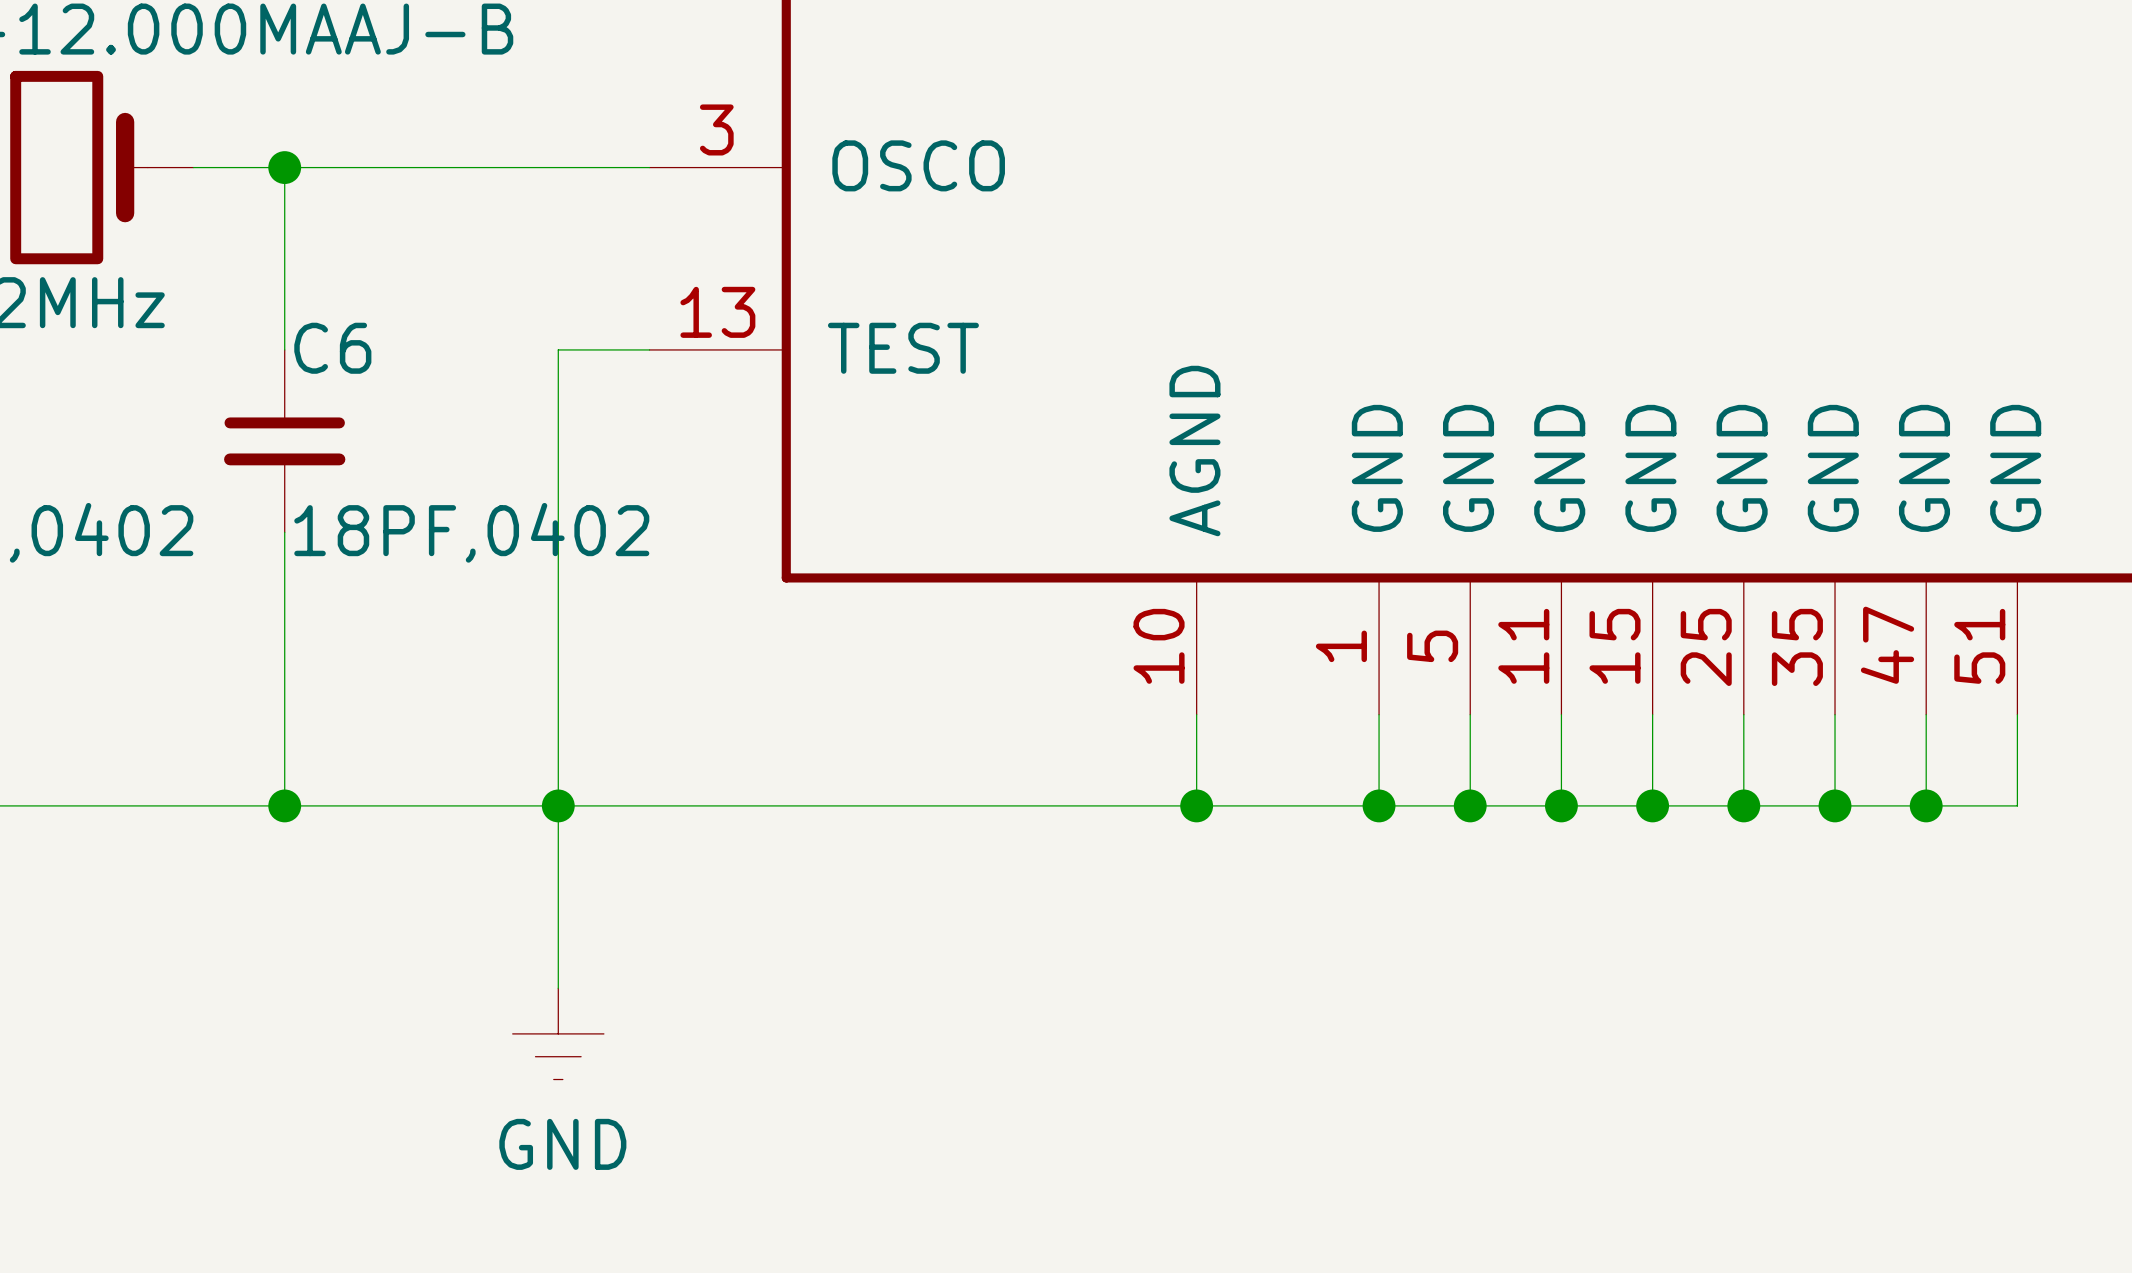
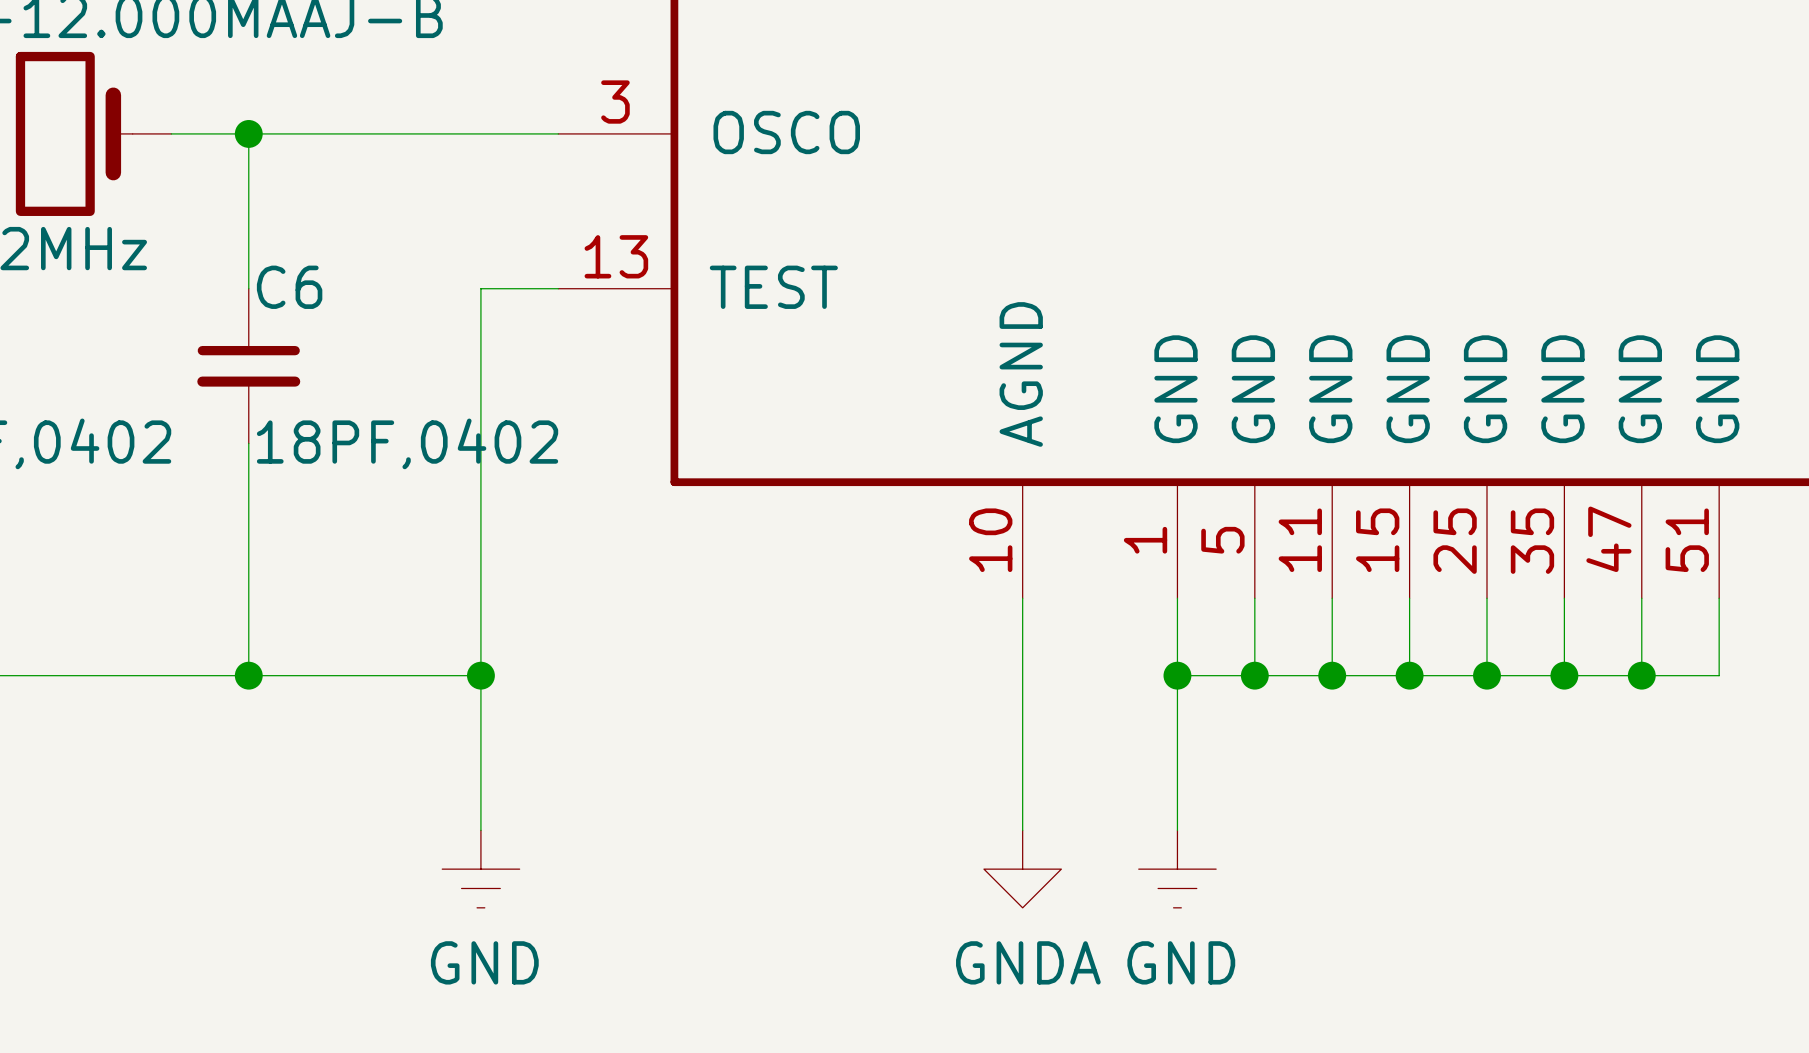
wire: (558, 805) (1379, 805) -> (1177, 830) (1177, 675)
wire: none -> (1022, 675) (1022, 830)
junction: (1196, 805) -> none
power symbol: none -> GNDA (1022, 869)
power symbol: none -> GND (1177, 869)

